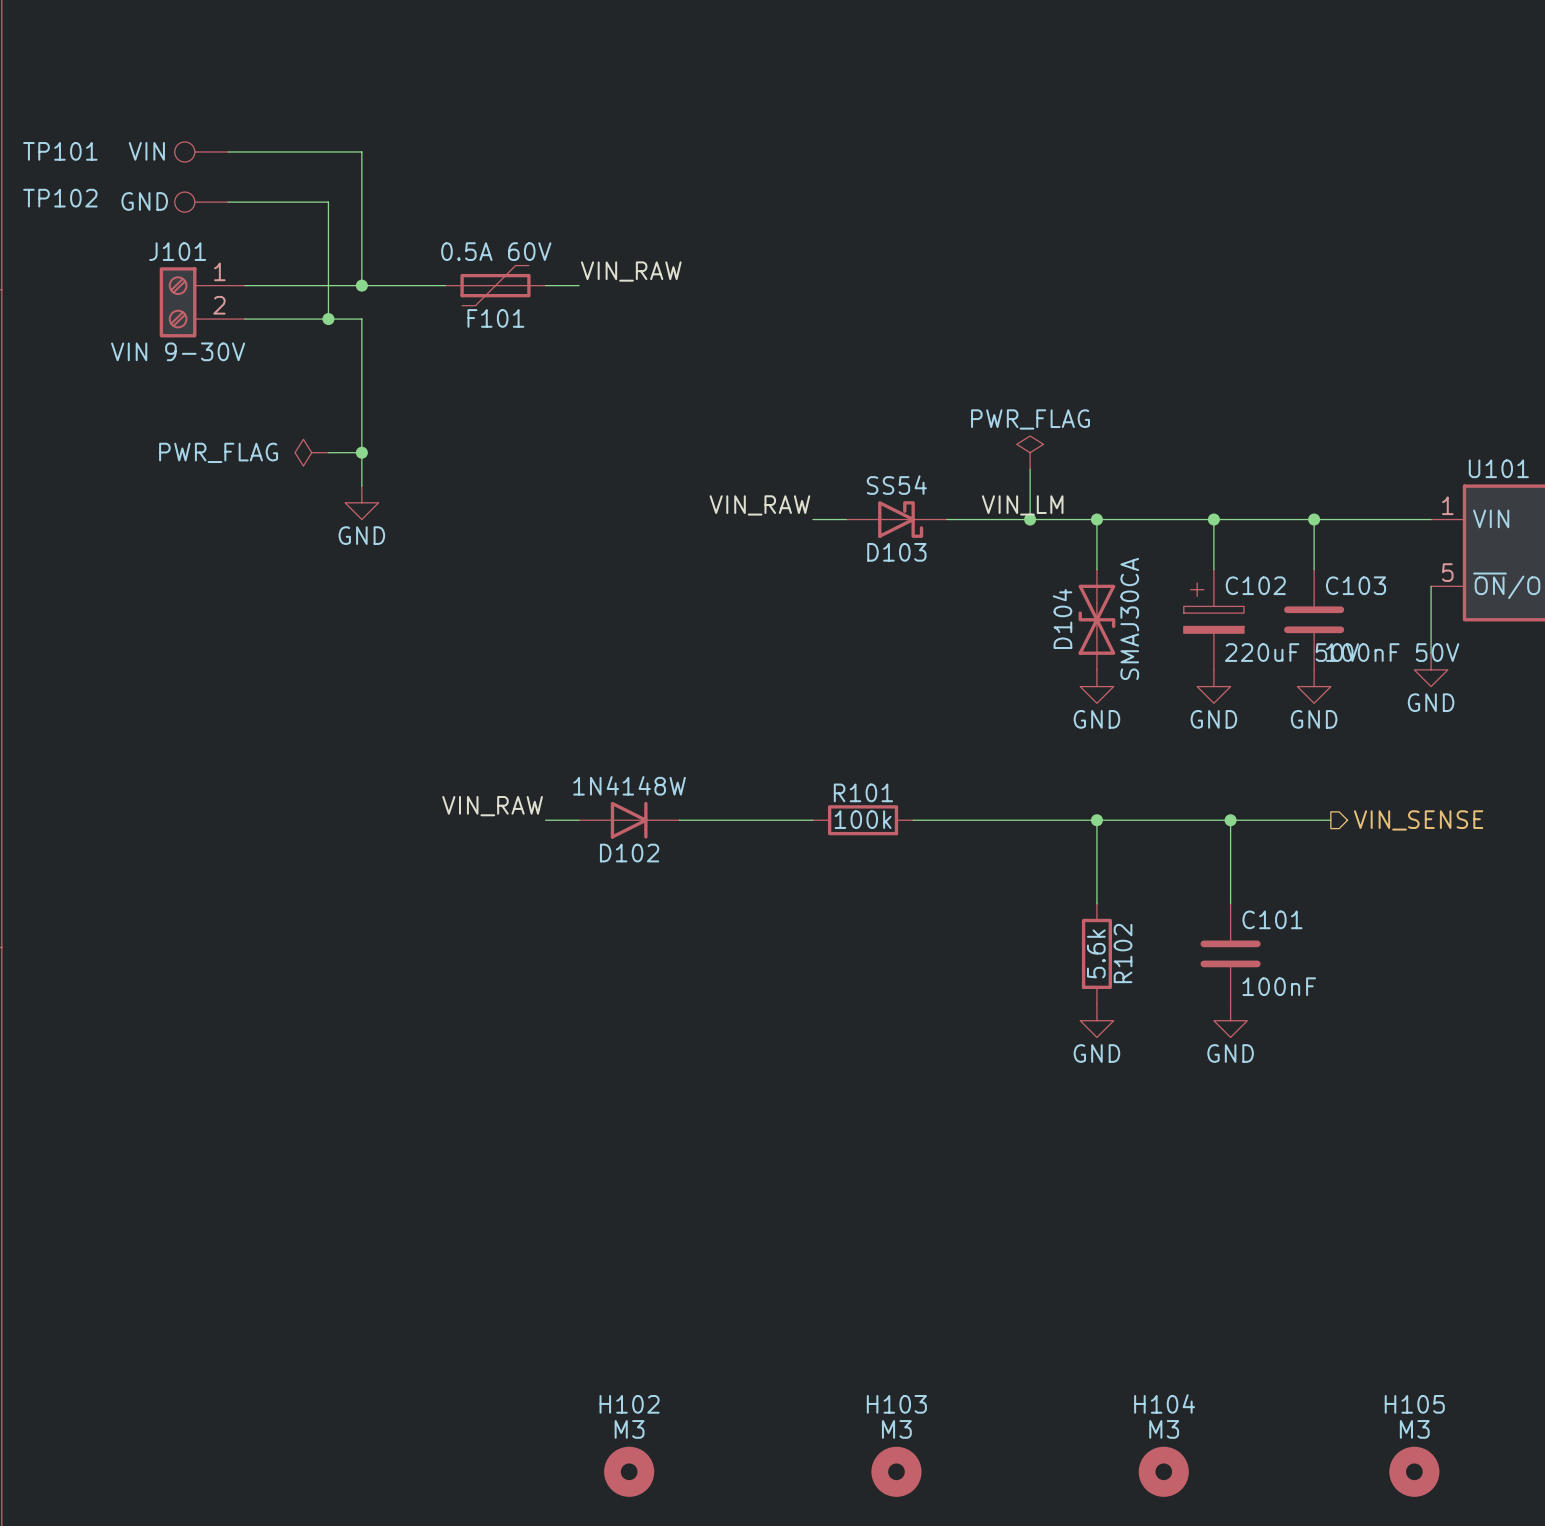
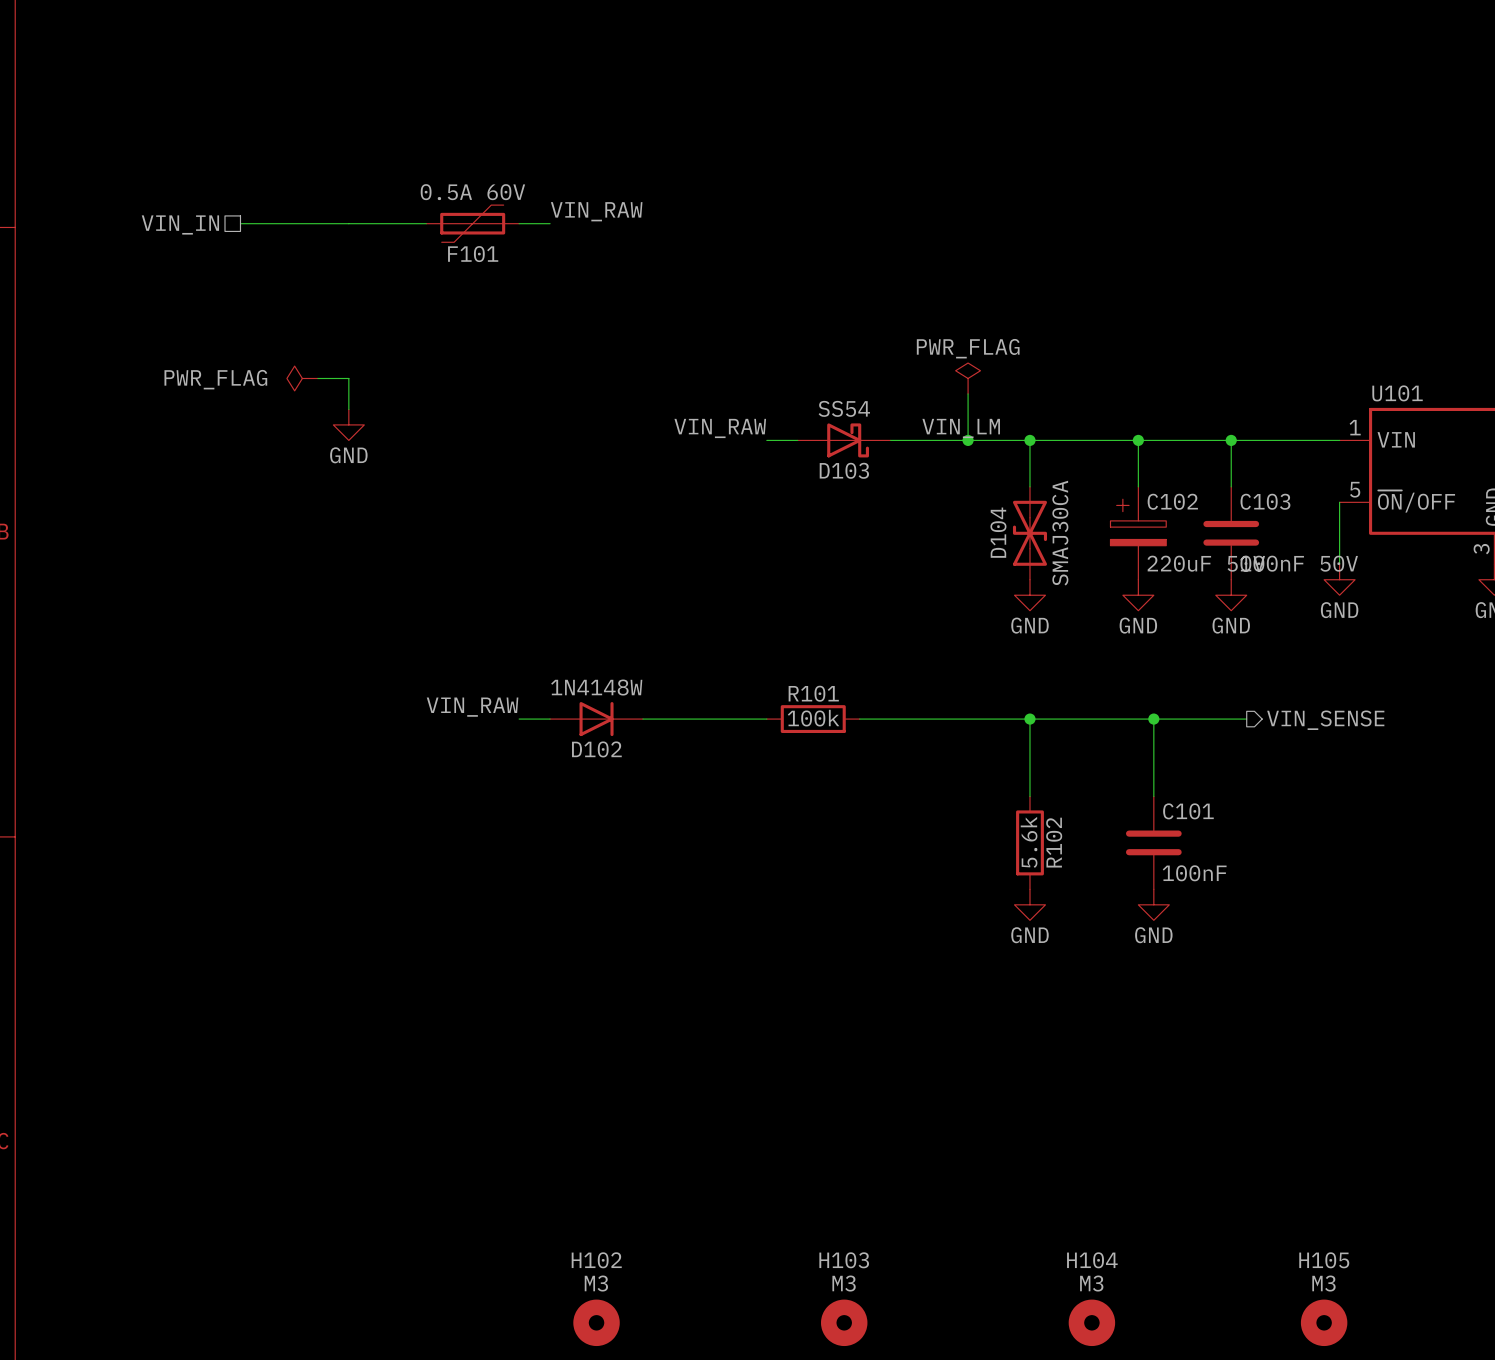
TP101: VIN (201, 151) -> none
wire: (228, 151) (361, 151) (361, 285) -> none
TP102: GND (201, 202) -> none
wire: (228, 202) (328, 202) (328, 319) -> none
hierarchical label: none -> VIN_IN (180, 224)
junction: (361, 285) -> none
J101: VIN 9-30V (202, 302) -> none
wire: (244, 319) (361, 319) (361, 452) -> none
junction: (328, 319) -> none
junction: (361, 452) -> none

